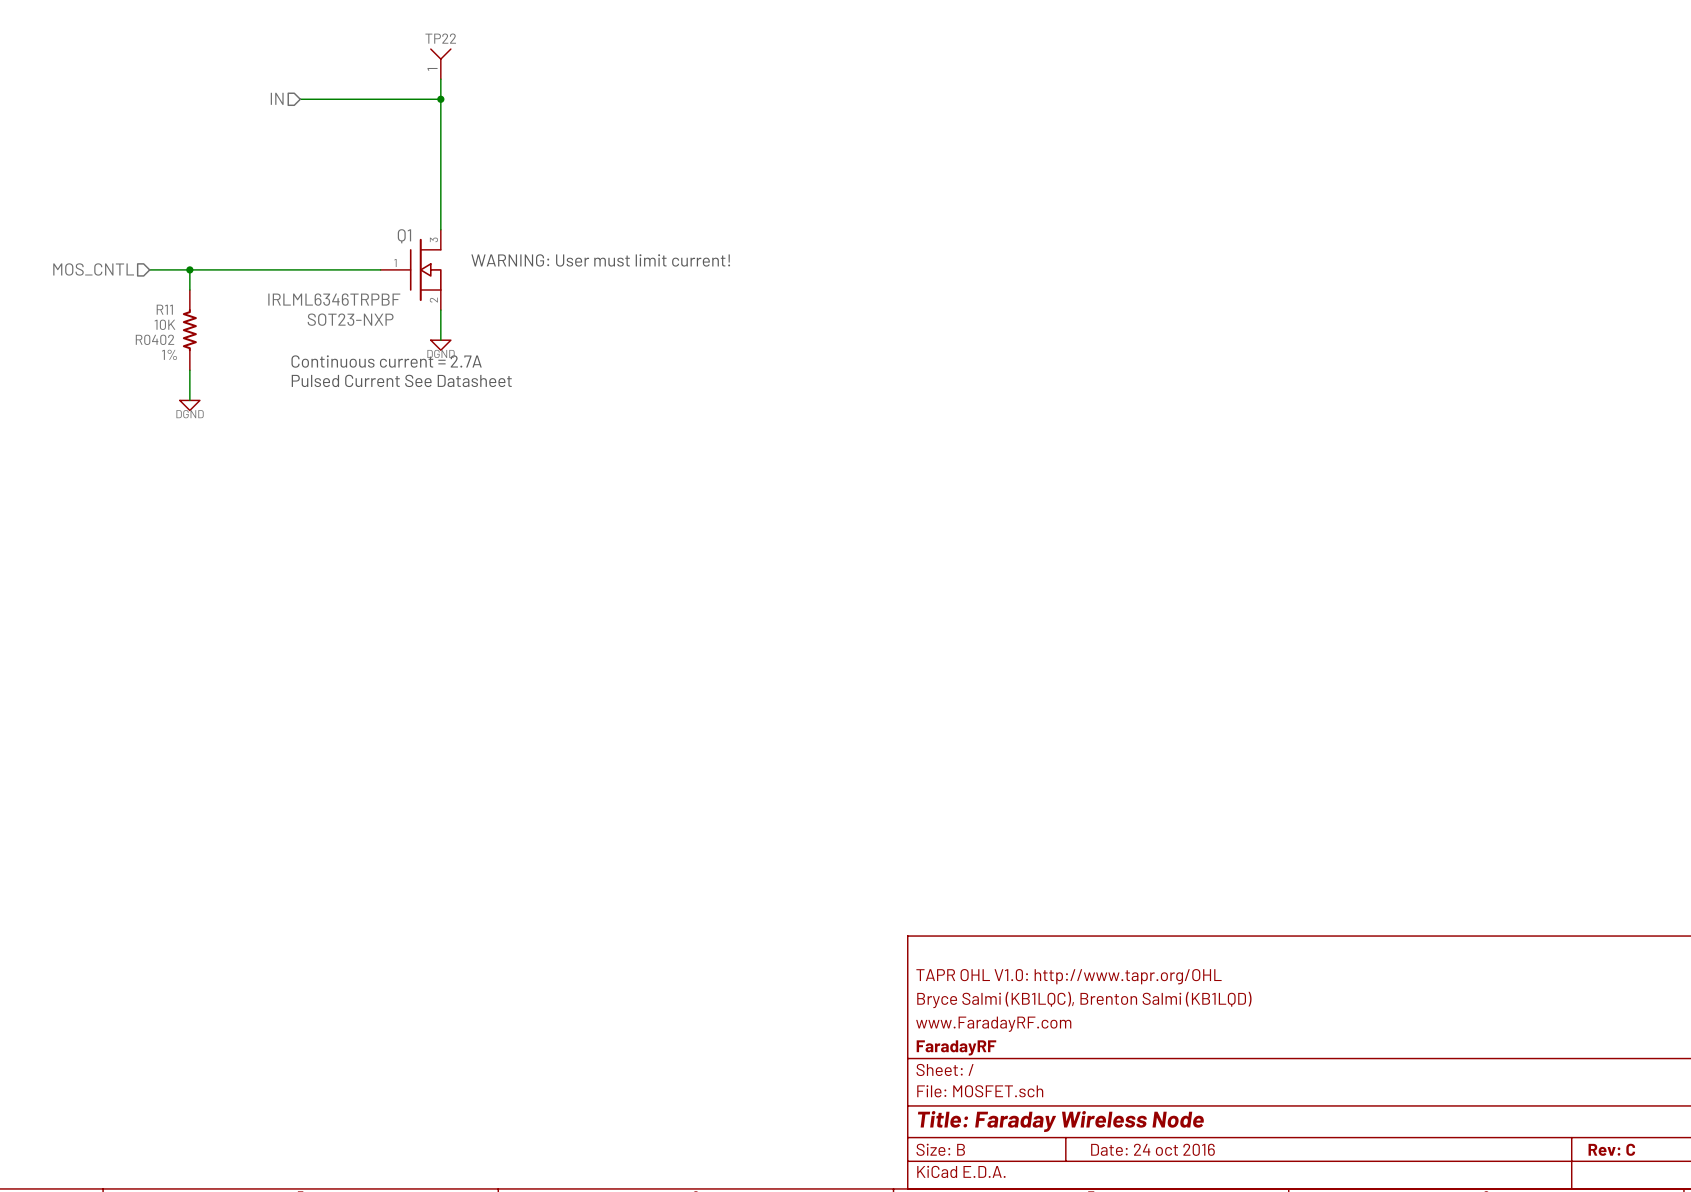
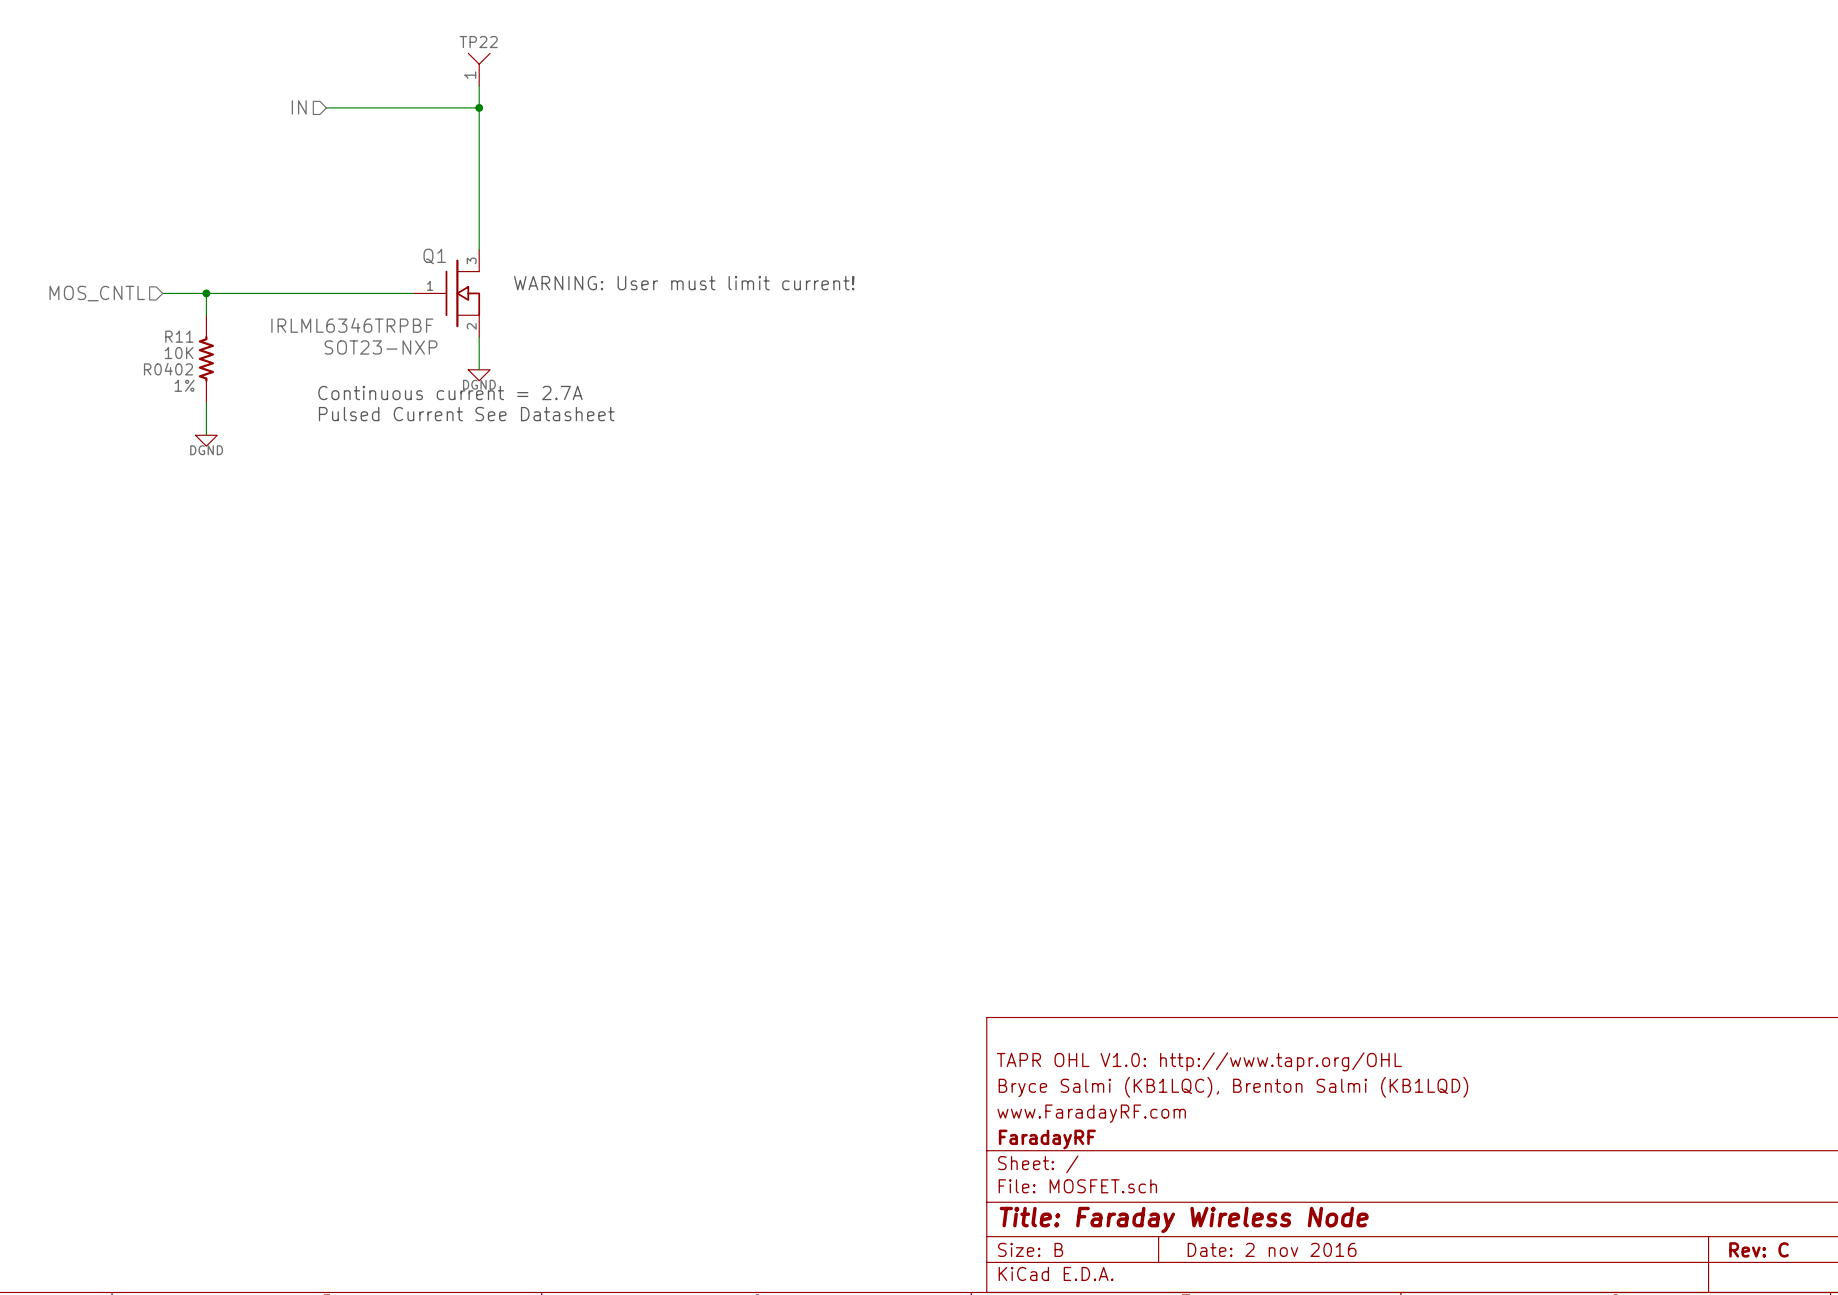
title block: Date: 24 oct 2016 (1152, 1149) -> Date: 2 nov 2016 (1272, 1249)

